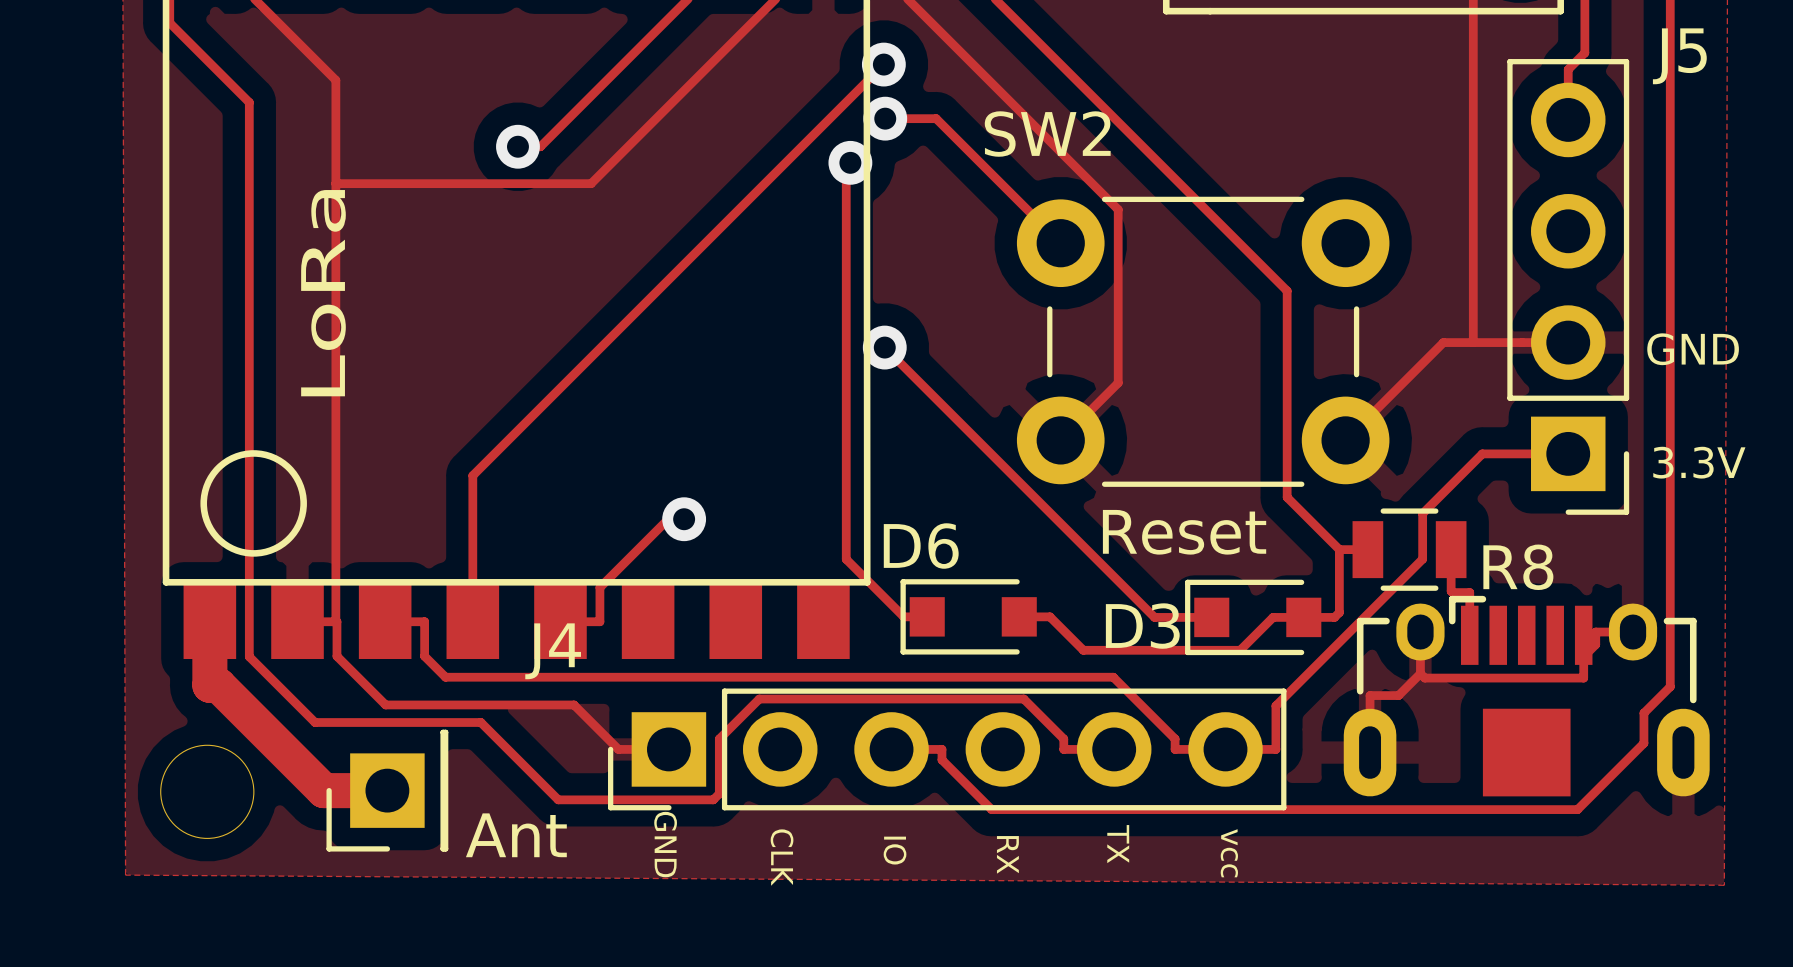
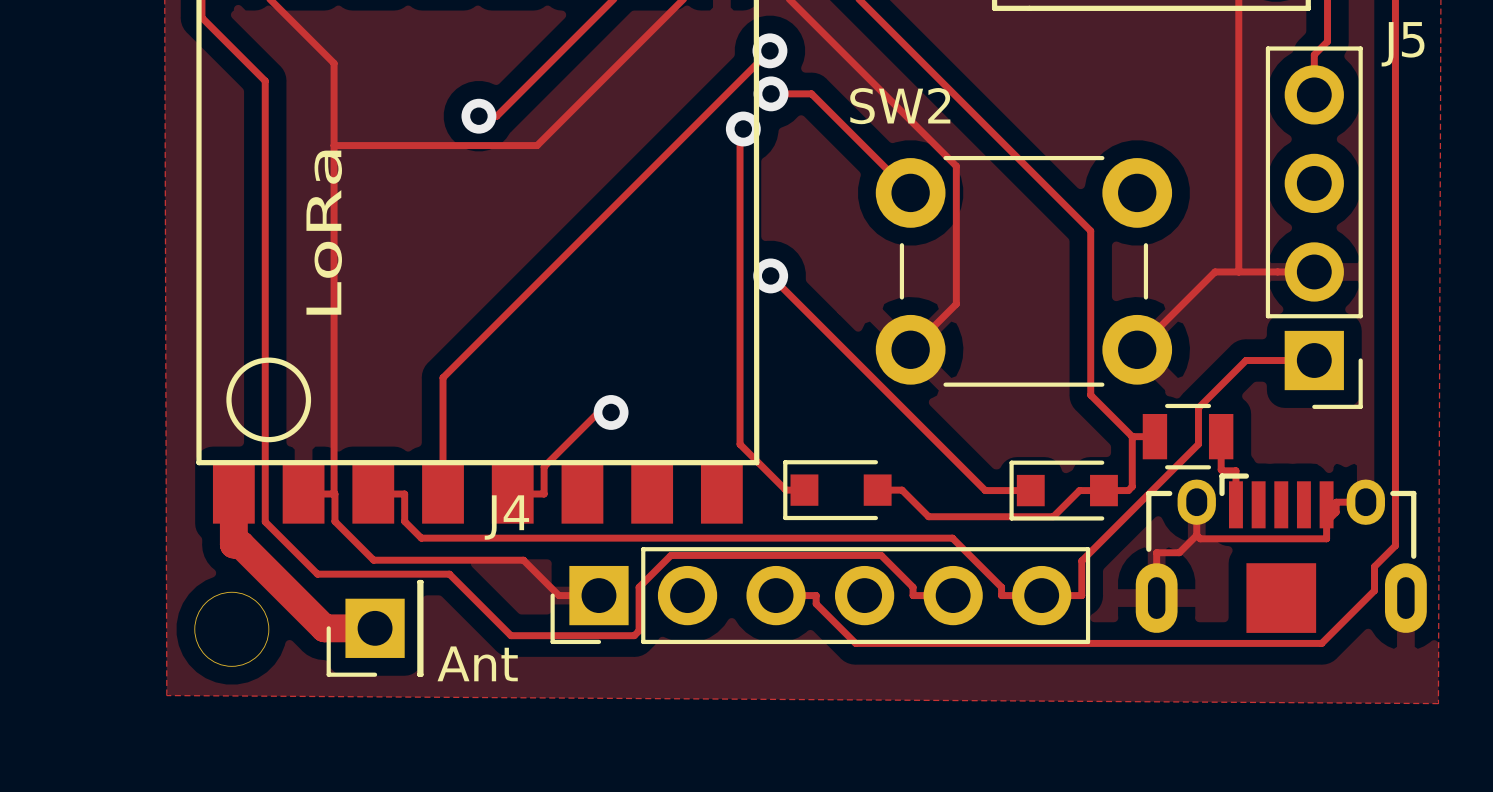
text: GND (1693, 349) -> none
text: 3.3V (1699, 462) -> none
text: Reset (1184, 532) -> none
D6 name: D6 (921, 546) -> none
R8 name: R8 (1518, 567) -> none
D3 name: D3 (1142, 626) -> none
text: GND (665, 844) -> none
text: TX (1118, 844) -> none
text: IO (895, 850) -> none
text: vcc (1229, 853) -> none
text: RX (1007, 854) -> none
text: CLK (782, 857) -> none

